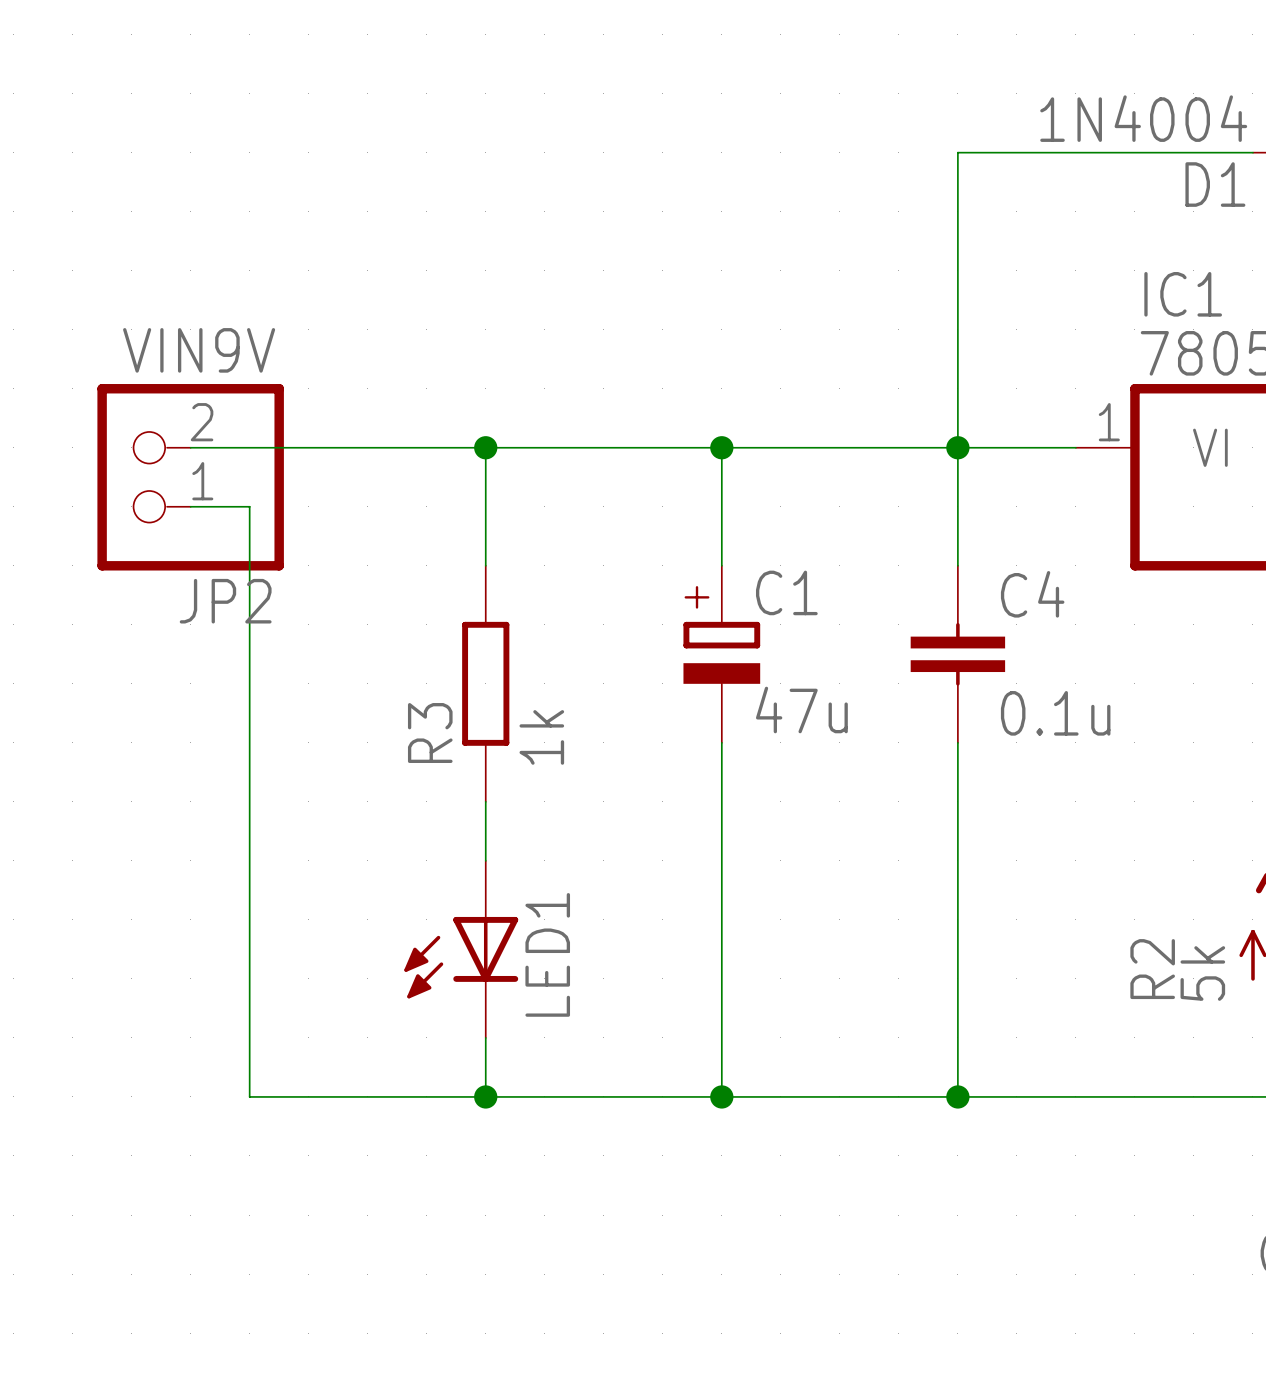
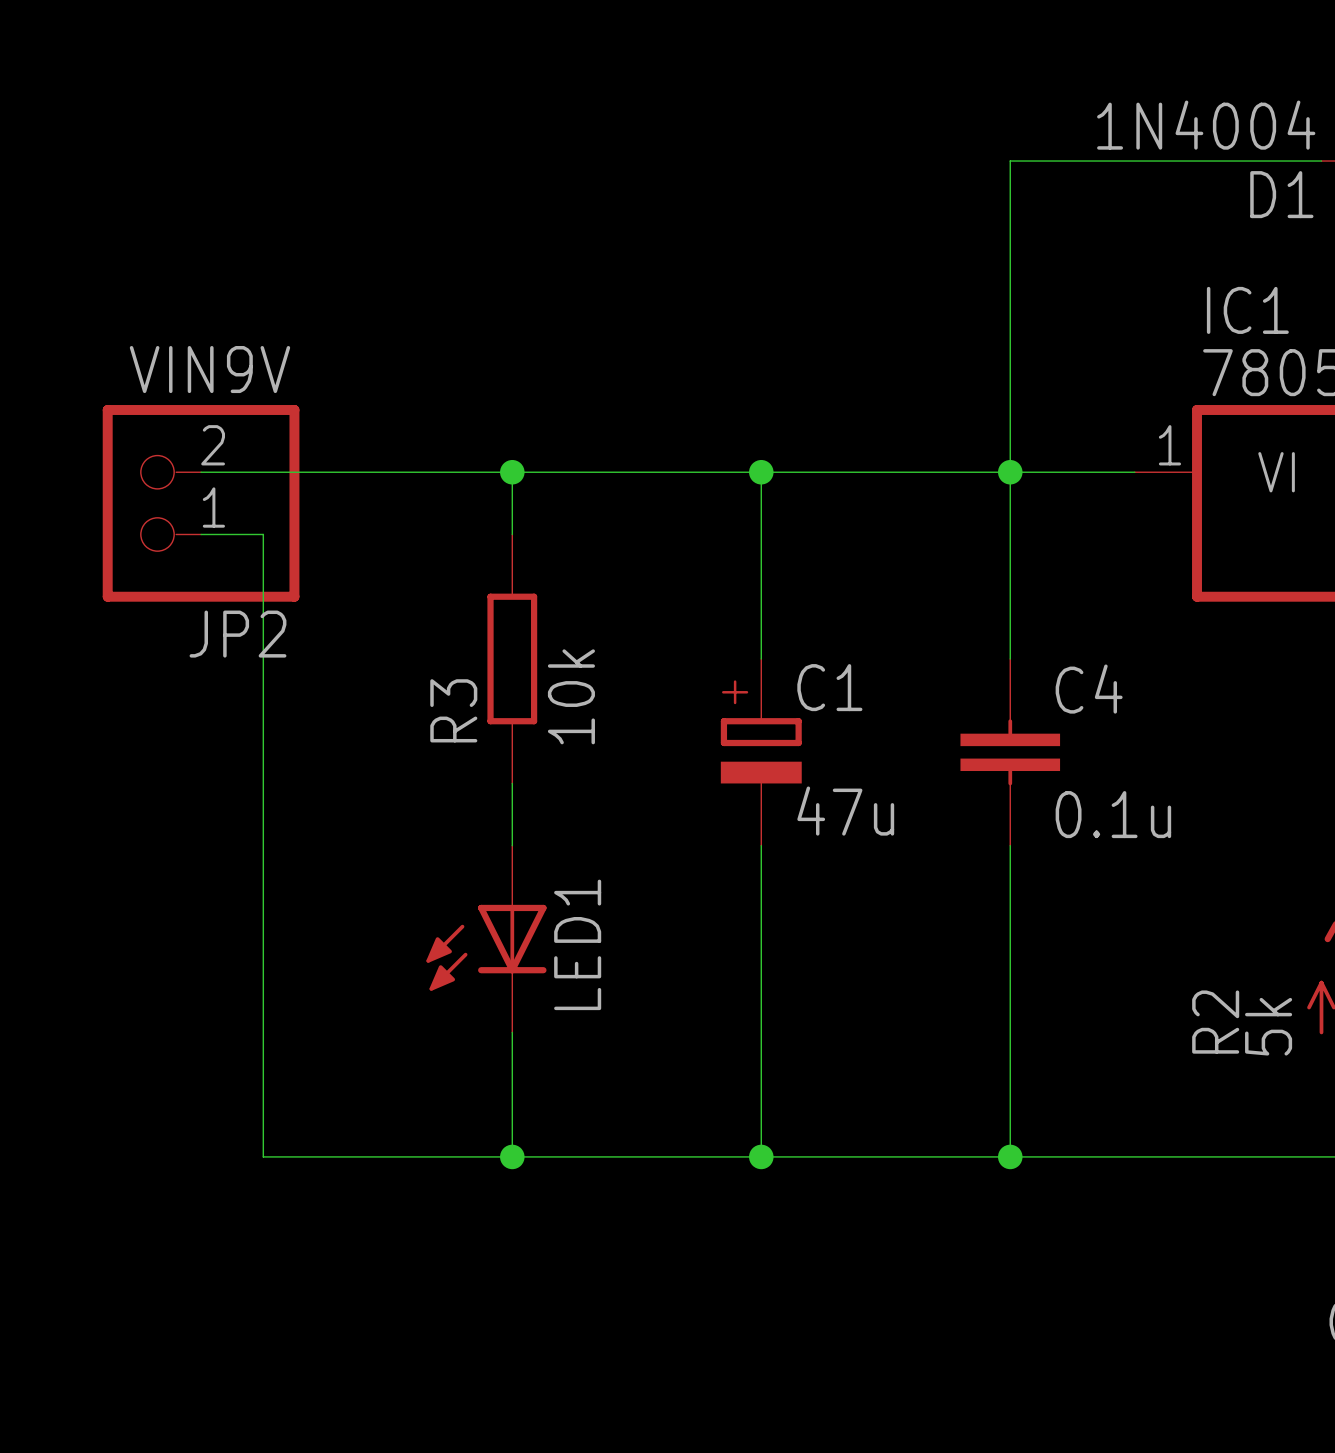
C1 position: (721, 654) -> (761, 752)
C4 position: (957, 654) -> (1010, 752)
R3 position: (485, 683) -> (512, 658)
R3 value: 1k (541, 737) -> 10k (571, 696)
LED1 position: (461, 949) -> (486, 939)

